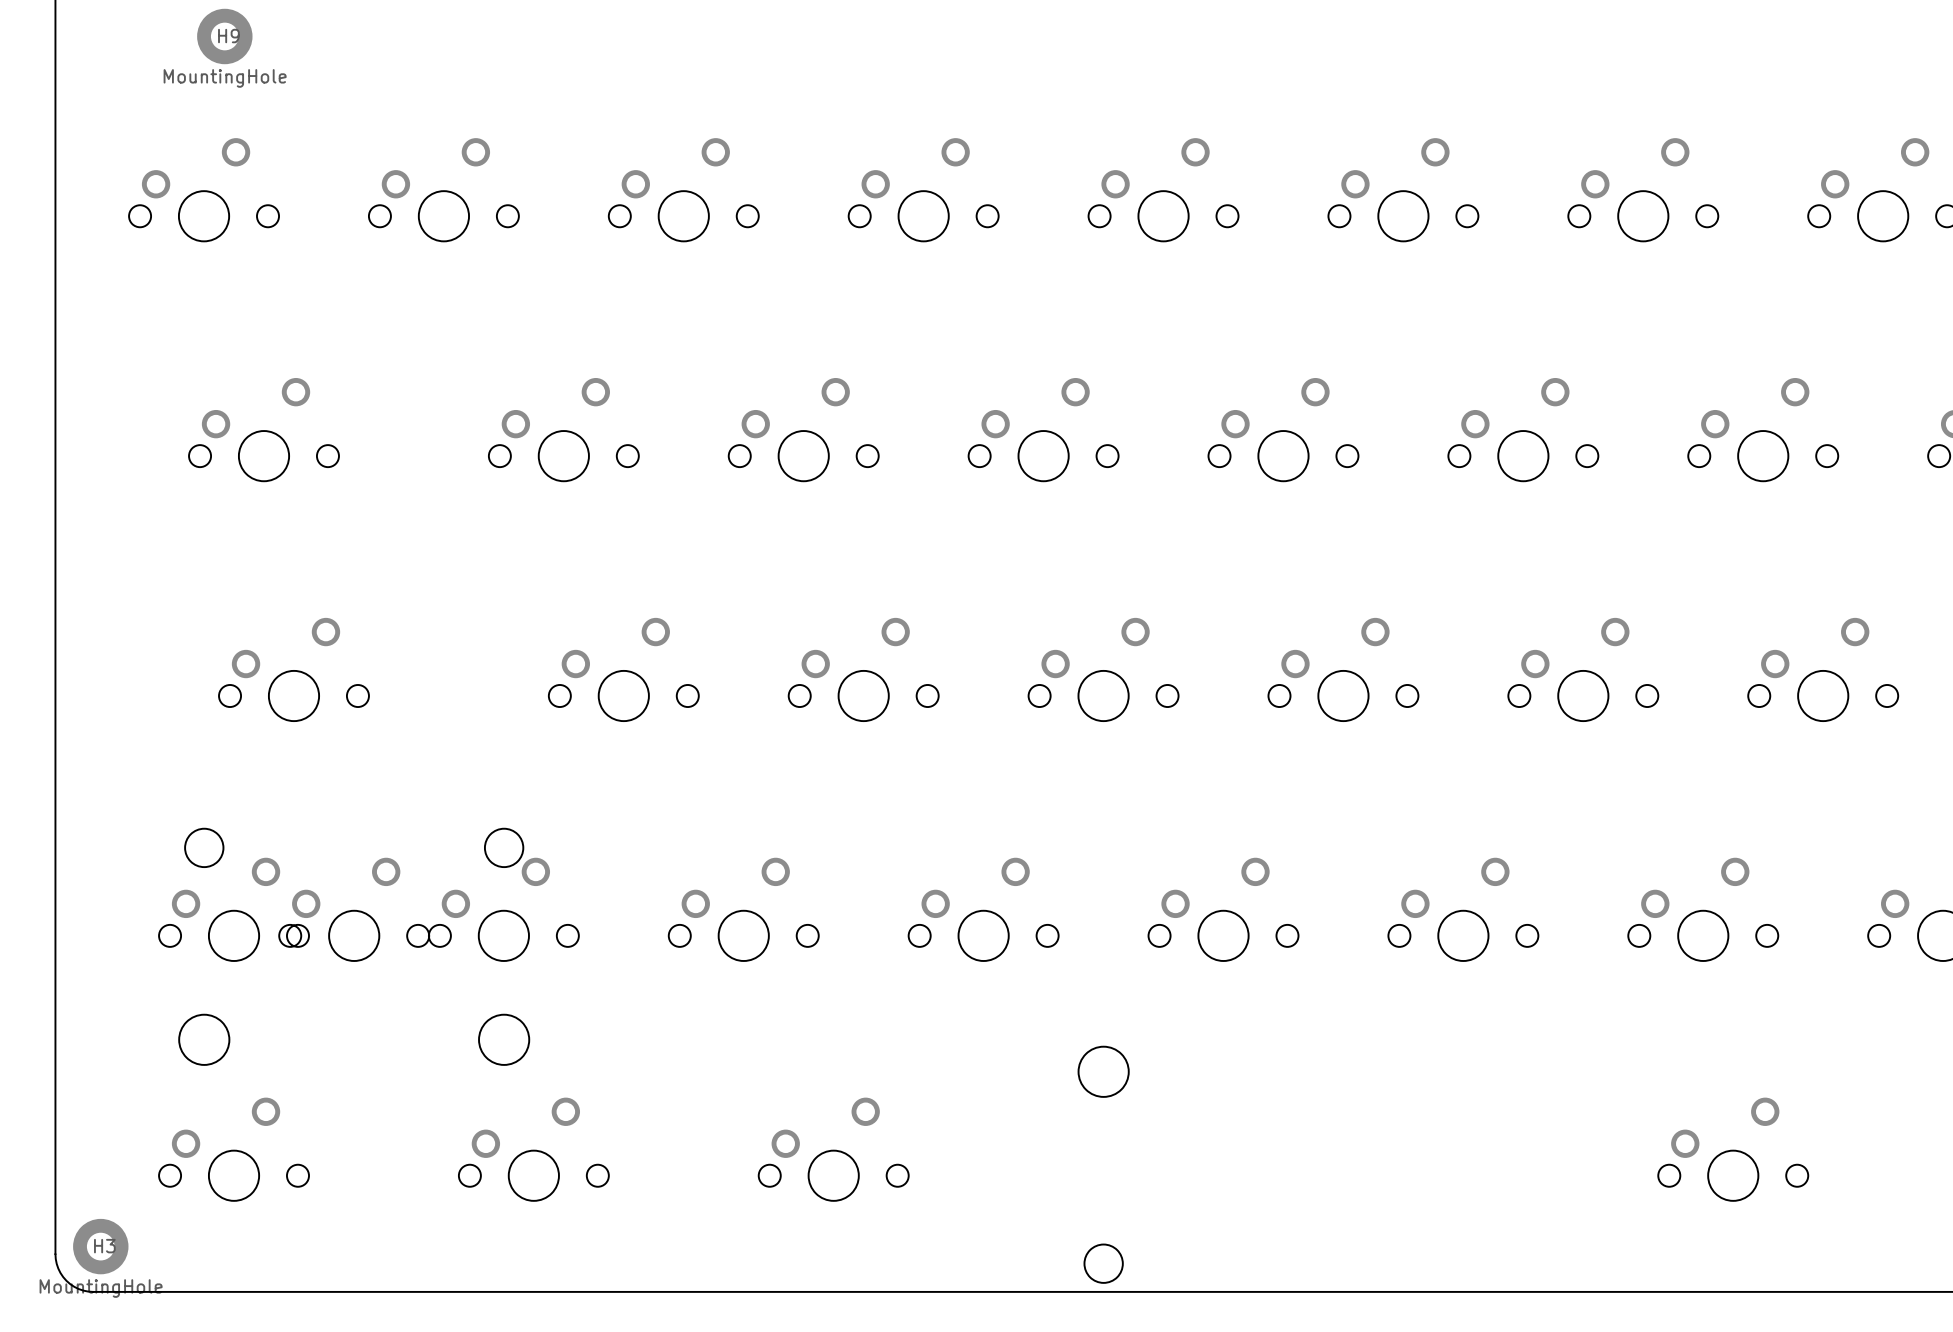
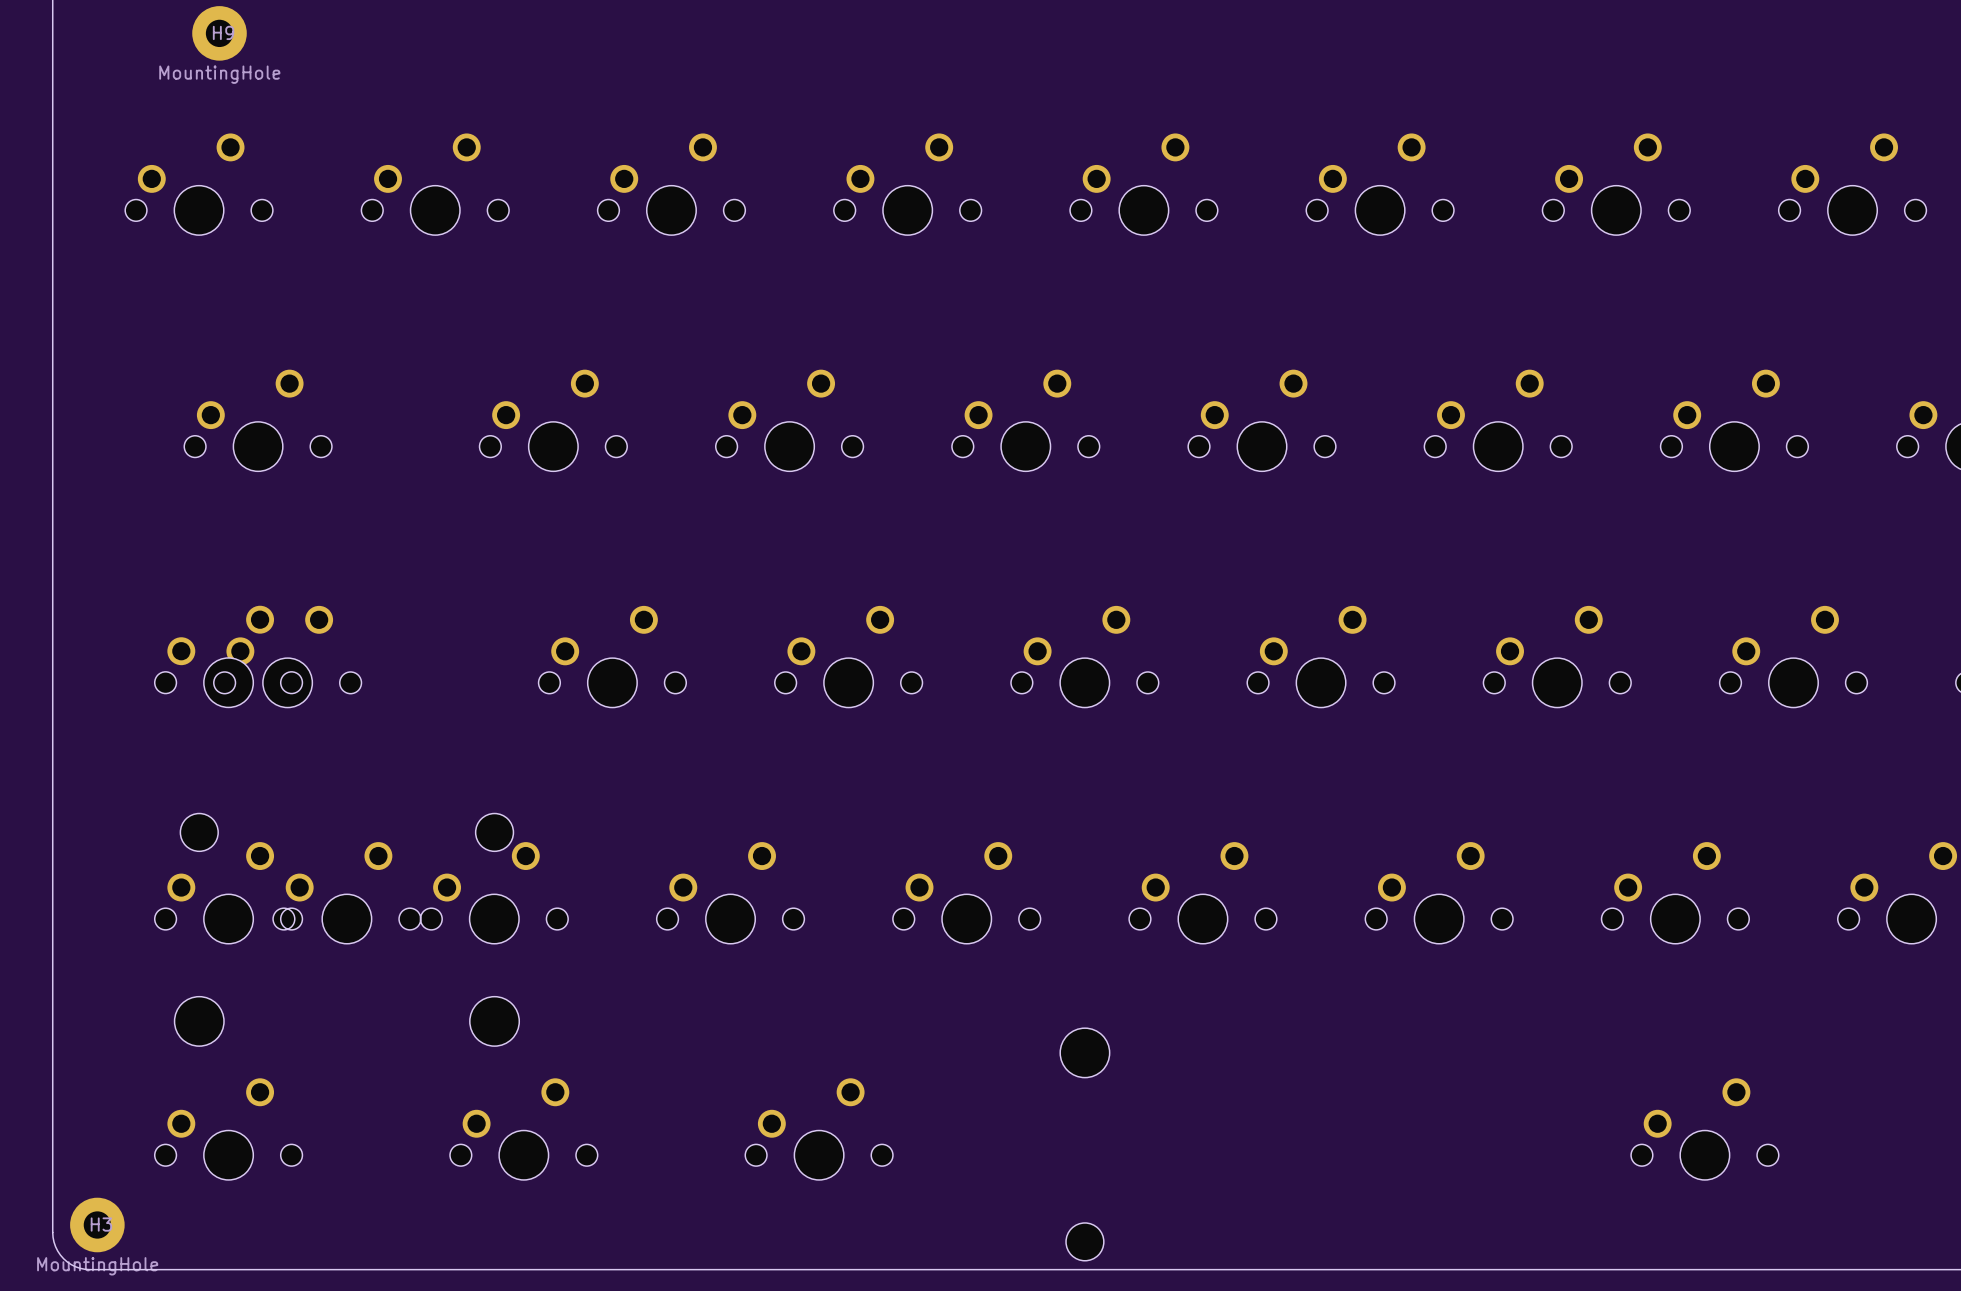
part: none -> (228, 656)

